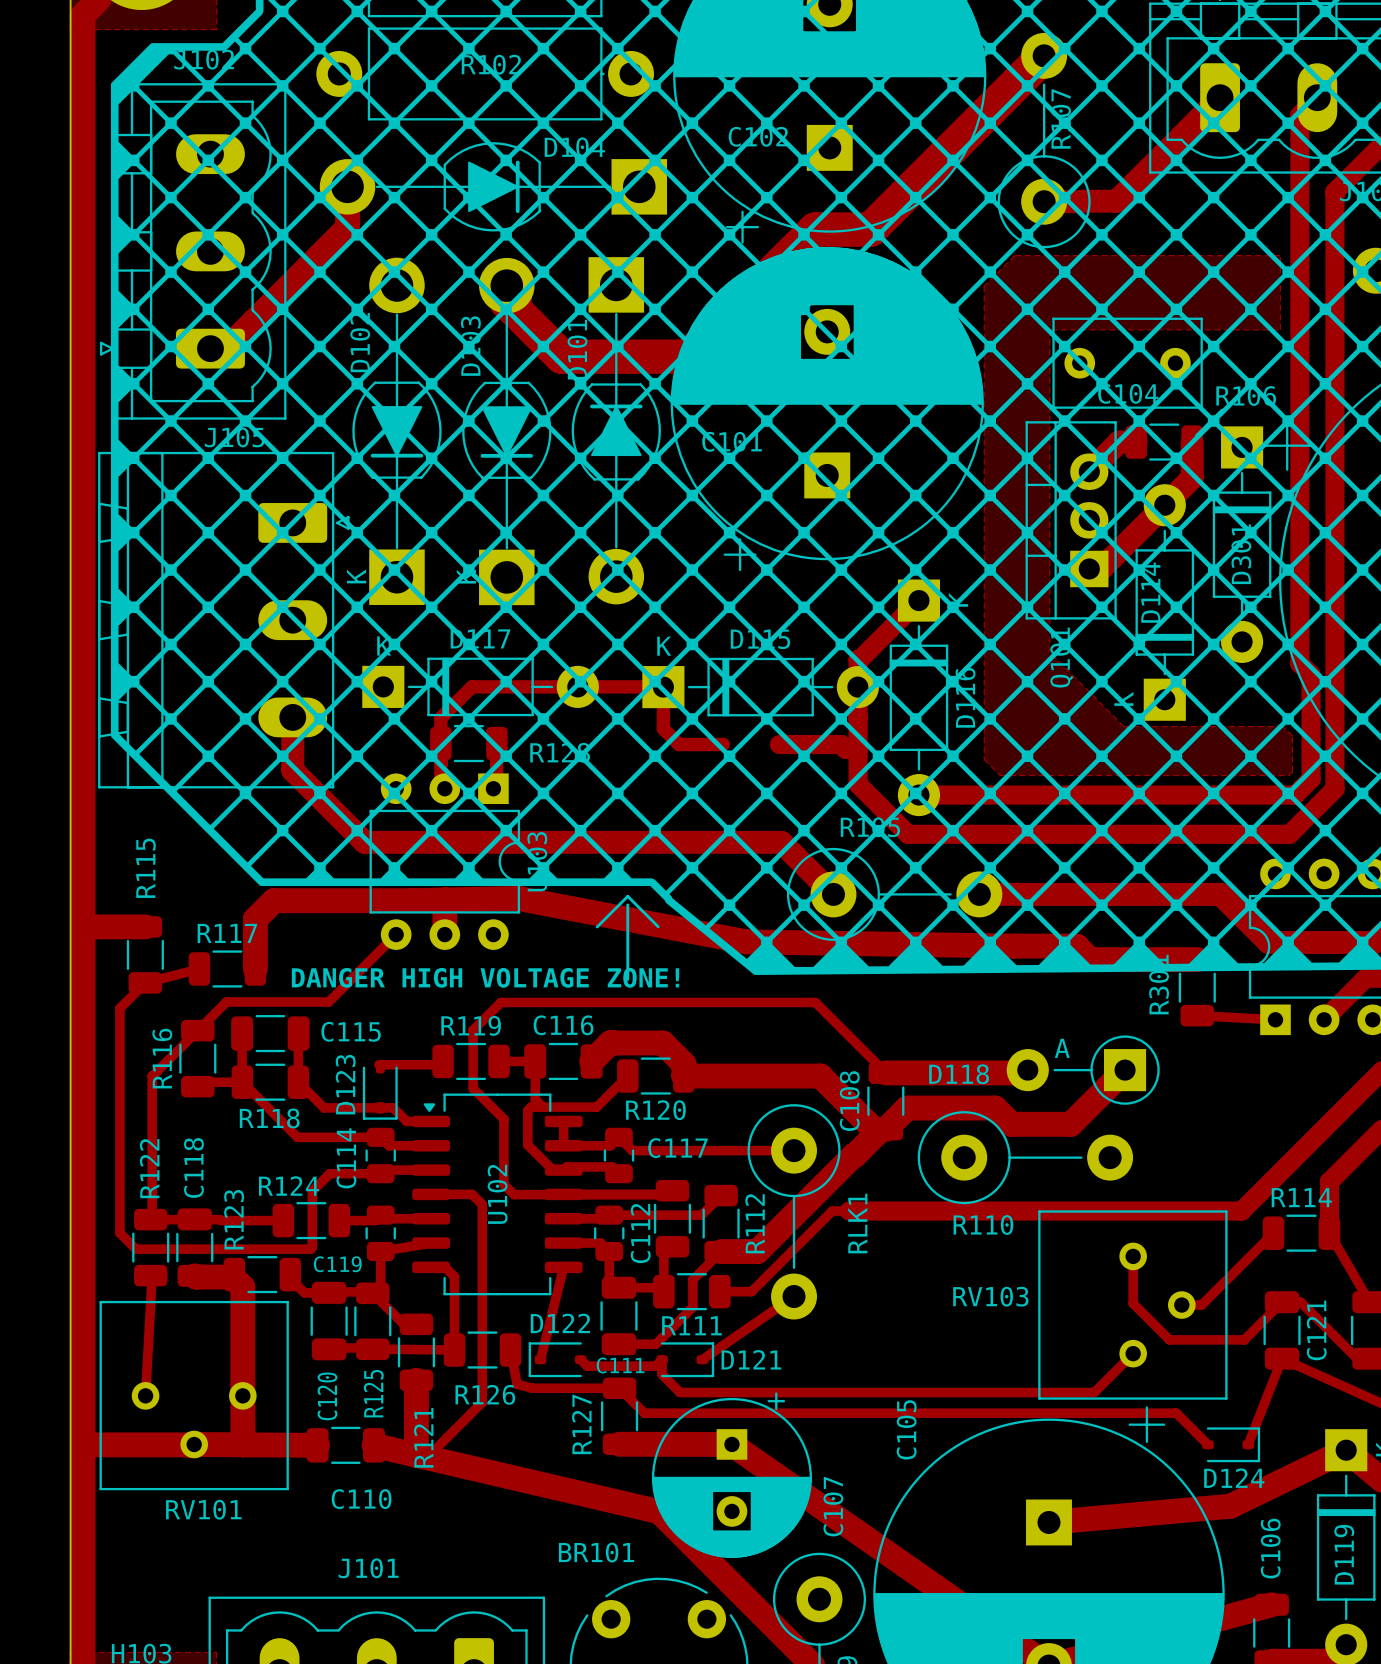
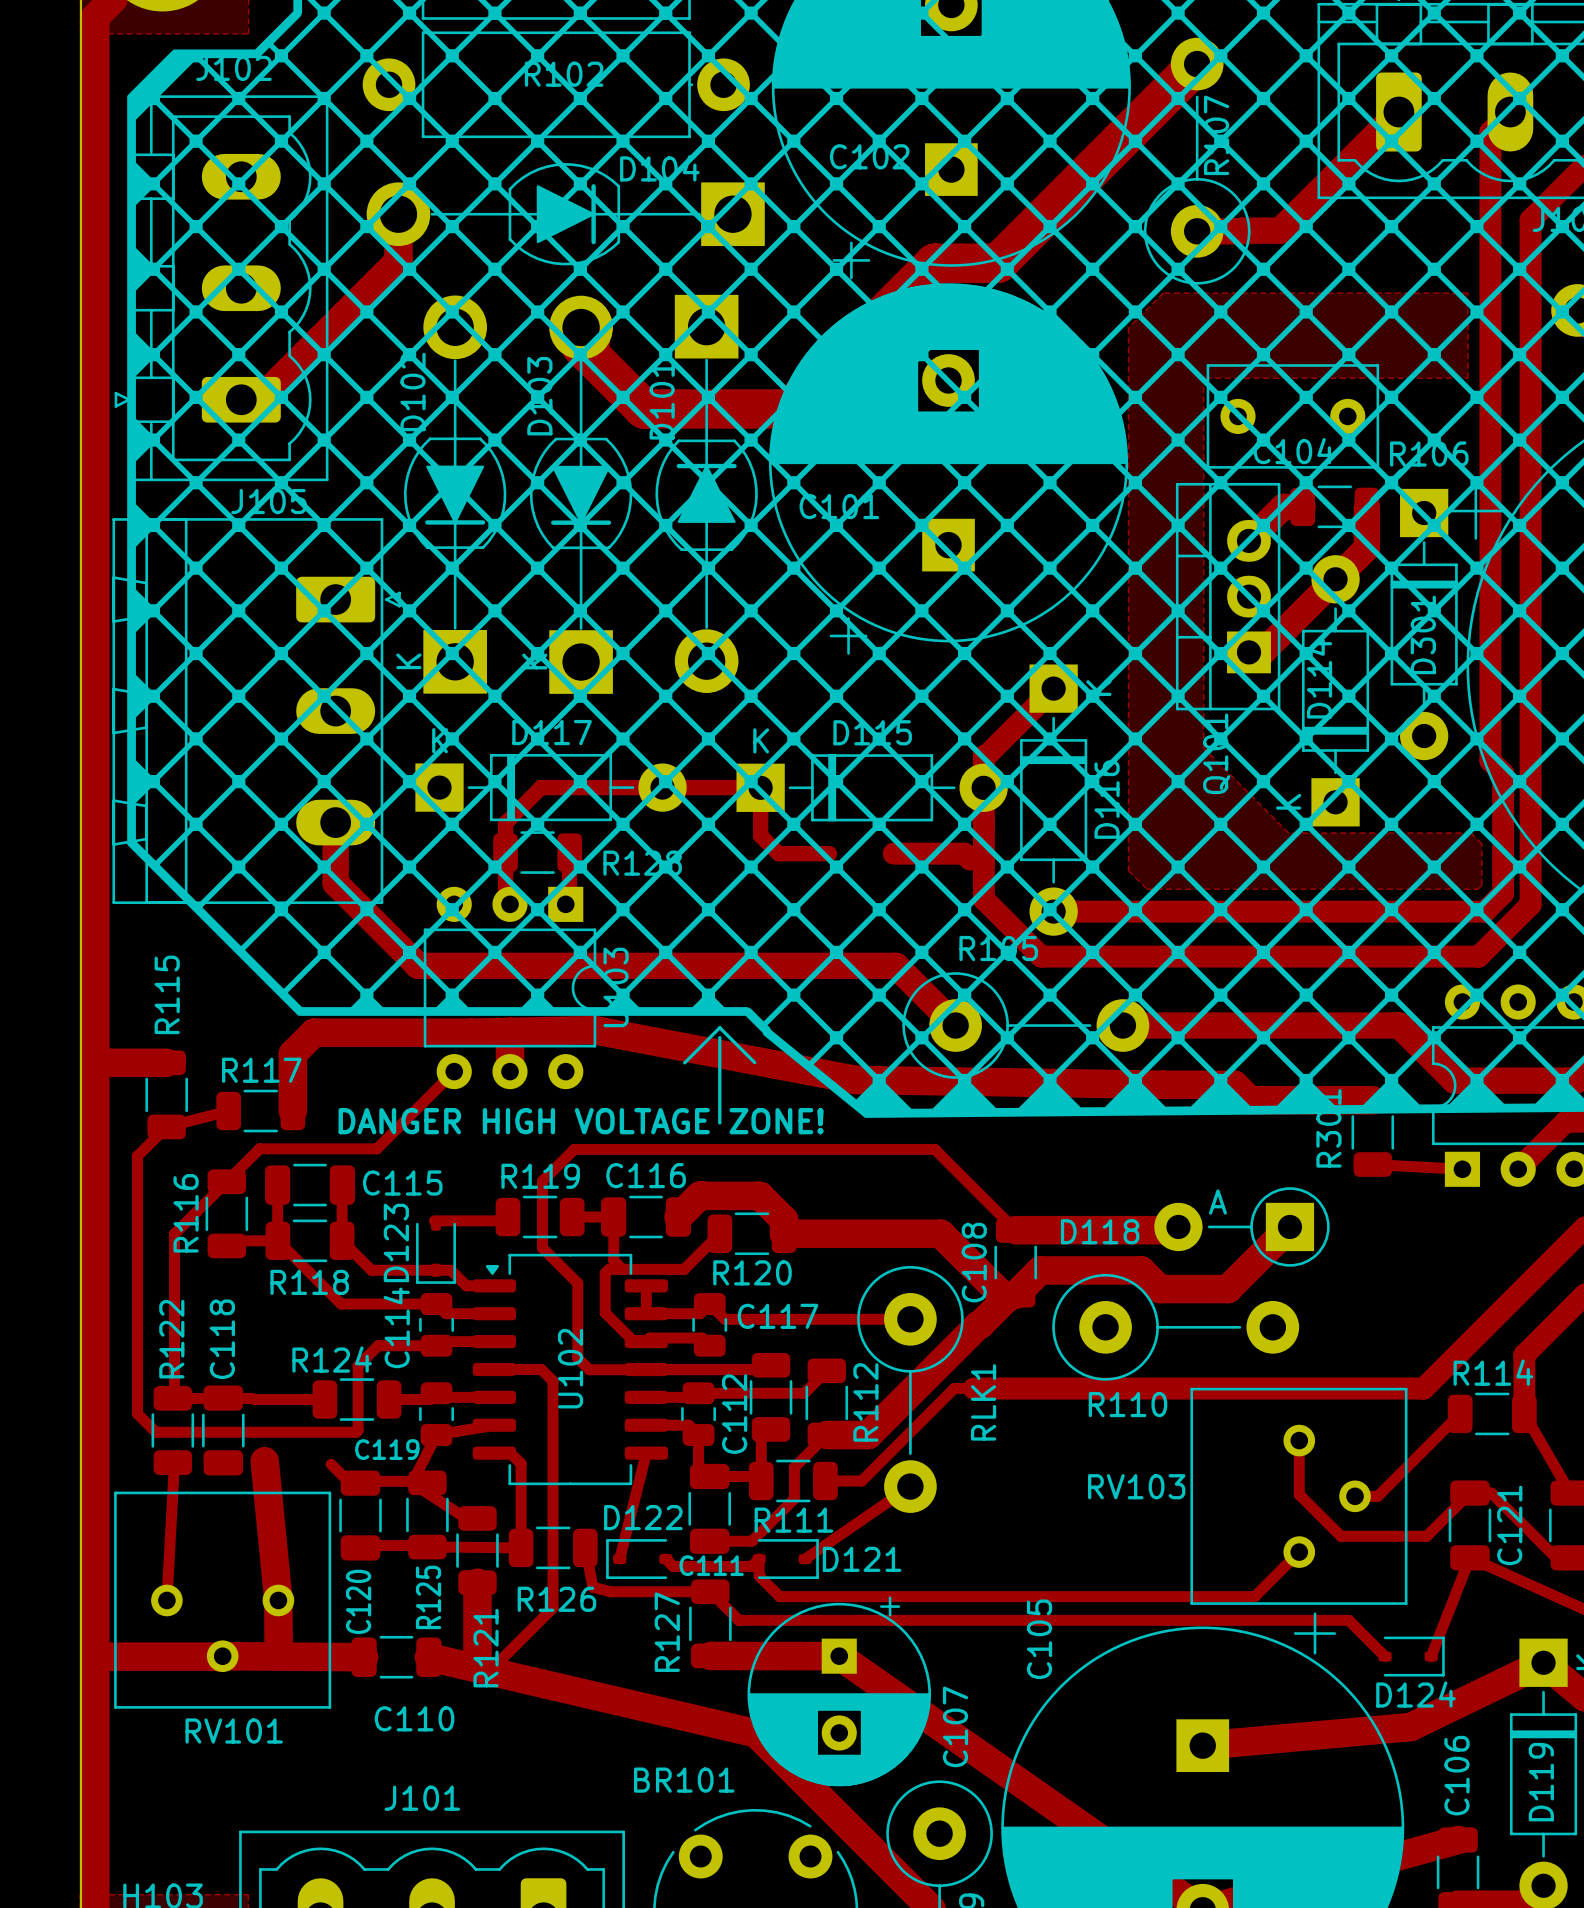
track: (380, 1251) (380, 1285) (372, 1293) (404, 1324) (415, 1324) -> (436, 1434) (412, 1483) (467, 1519)
R123: (262, 1274) -> none
track: (194, 1275) (232, 1277) (242, 1287) (242, 1395) -> (264, 1461) (278, 1600)
C120 position: (329, 1321) -> (360, 1515)

